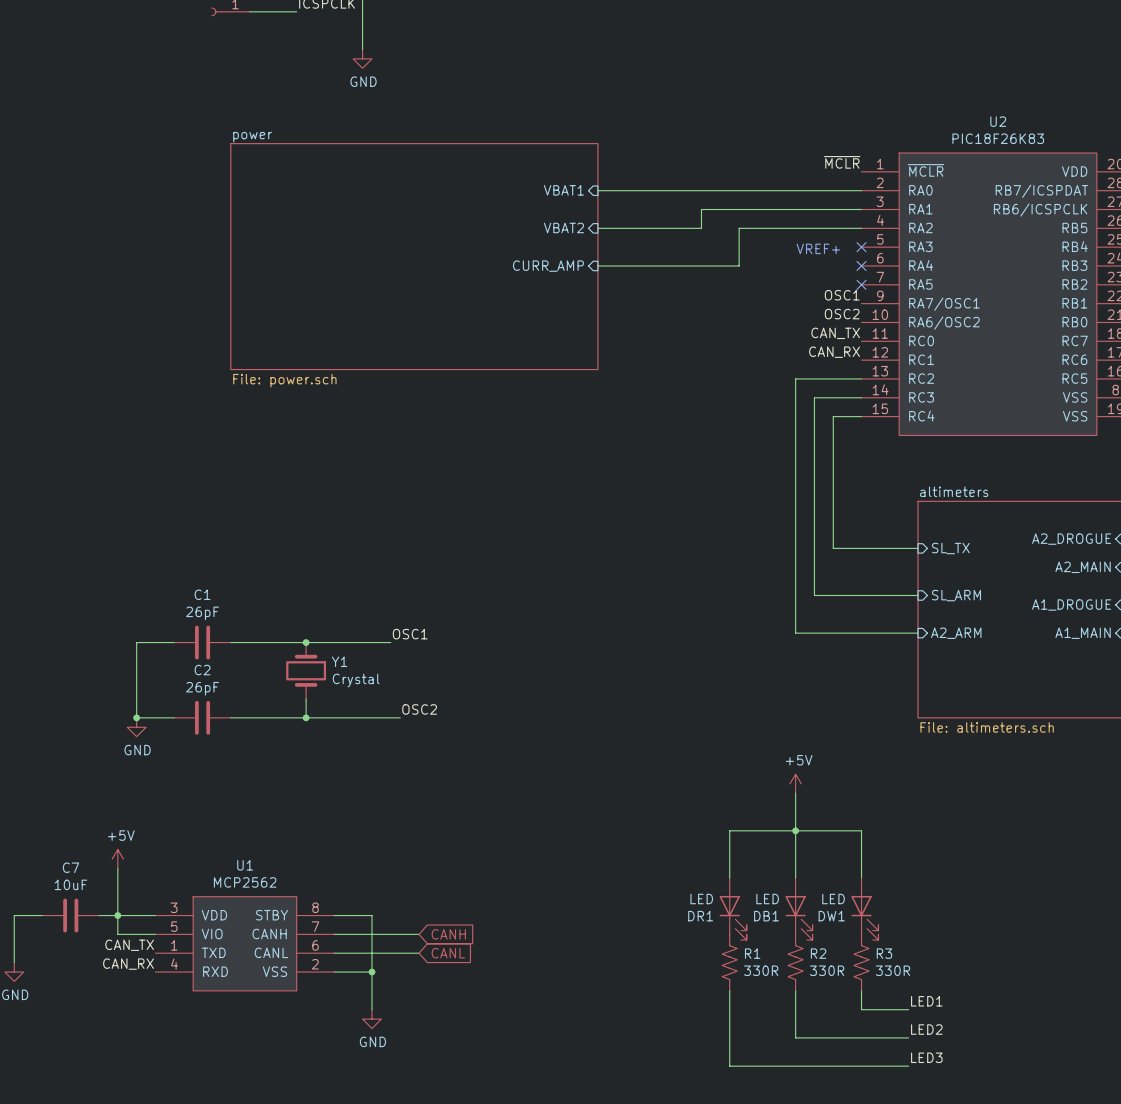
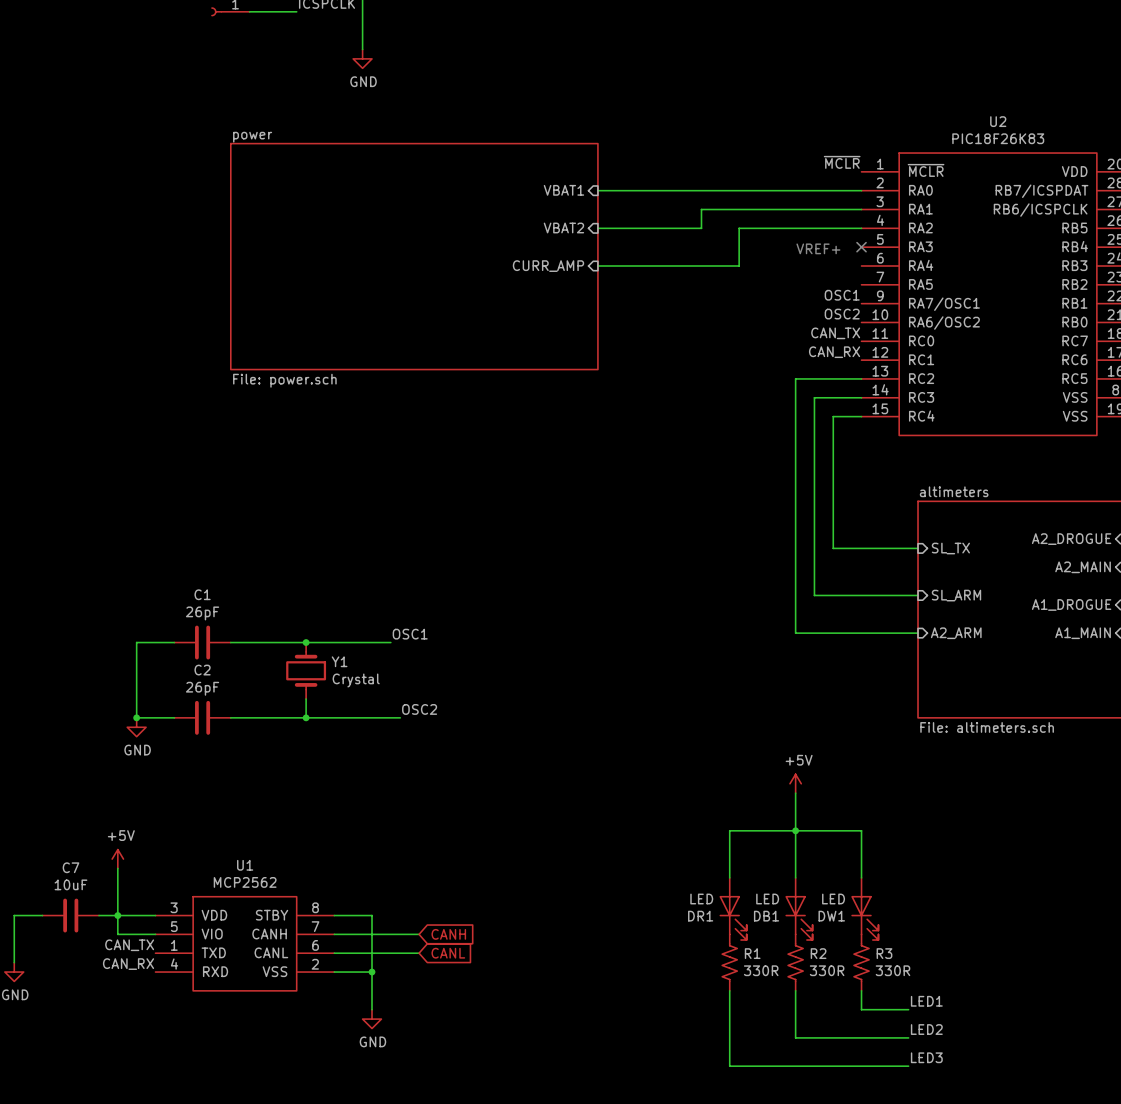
no-connect mark: (861, 265) -> none
no-connect mark: (861, 284) -> none

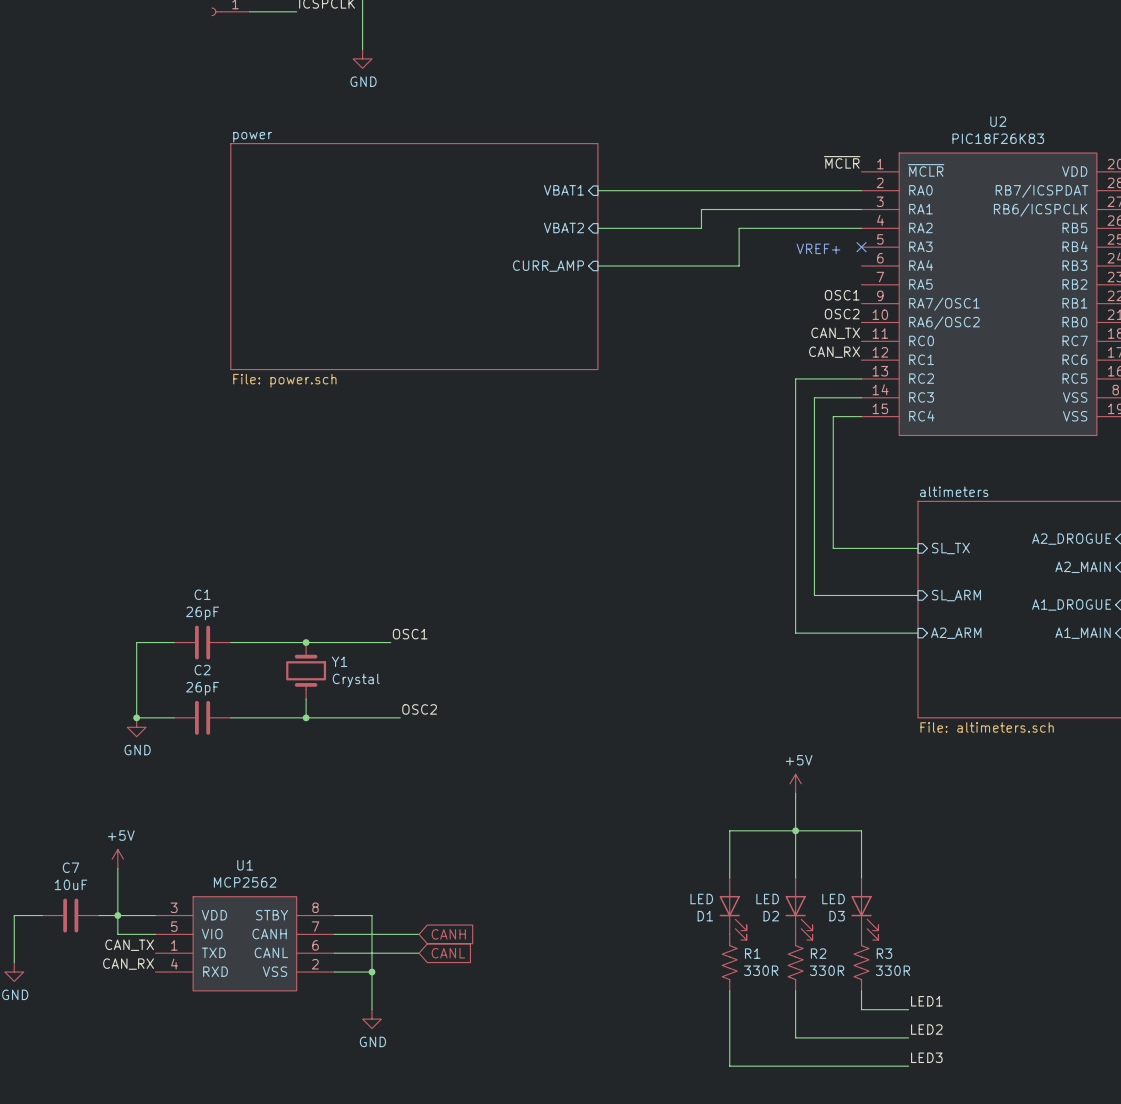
DR1 name: DR1 (700, 916) -> D1 (705, 916)
DB1 name: DB1 (766, 916) -> D2 (771, 916)
DW1 name: DW1 (831, 916) -> D3 (837, 916)

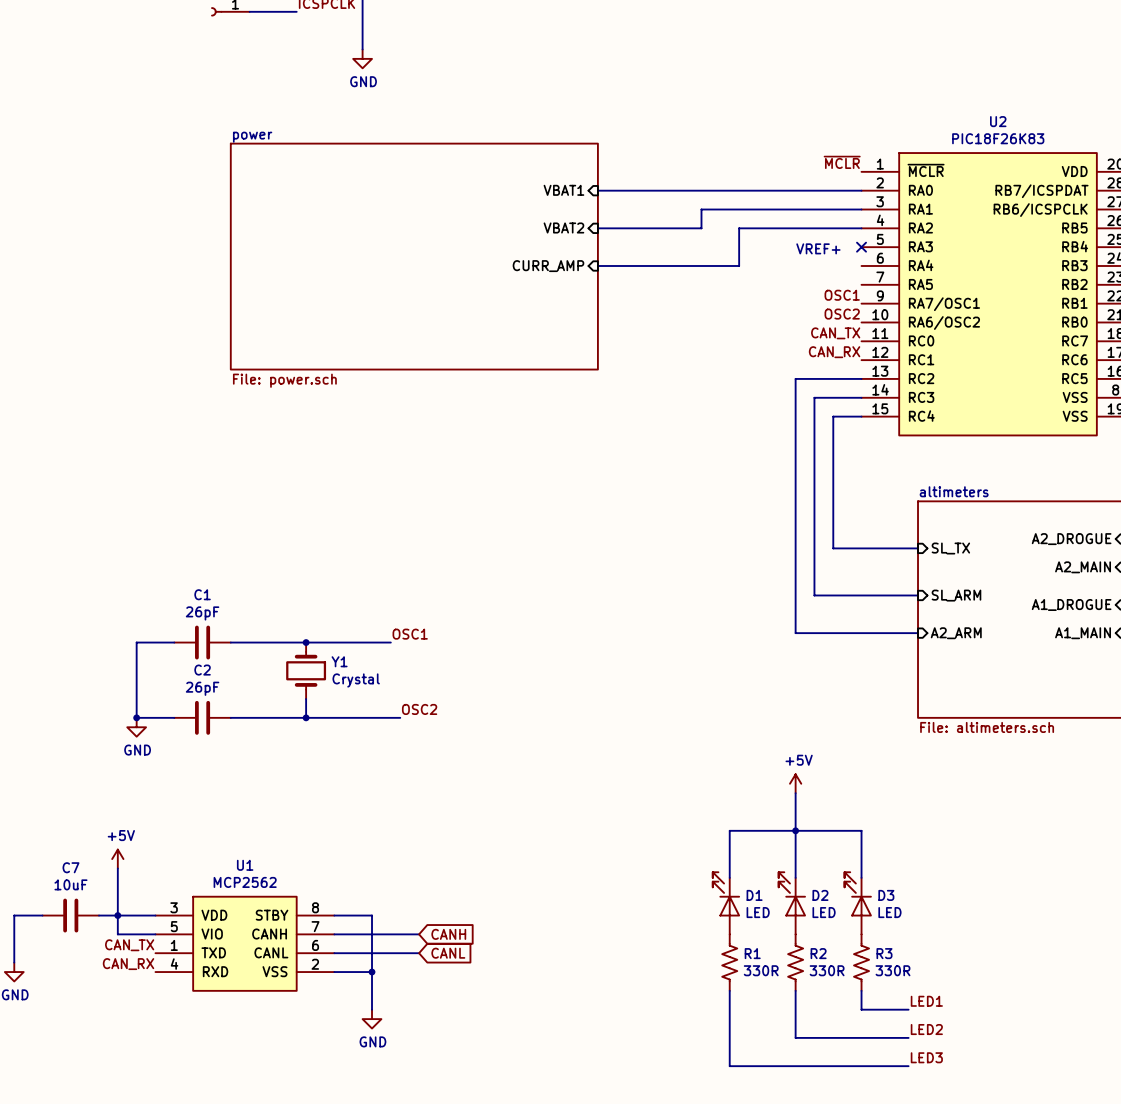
D1 rotation: 0° (733, 917) -> 180° (726, 894)
D2 rotation: 0° (799, 917) -> 180° (792, 894)
D3 rotation: 0° (864, 917) -> 180° (858, 894)

